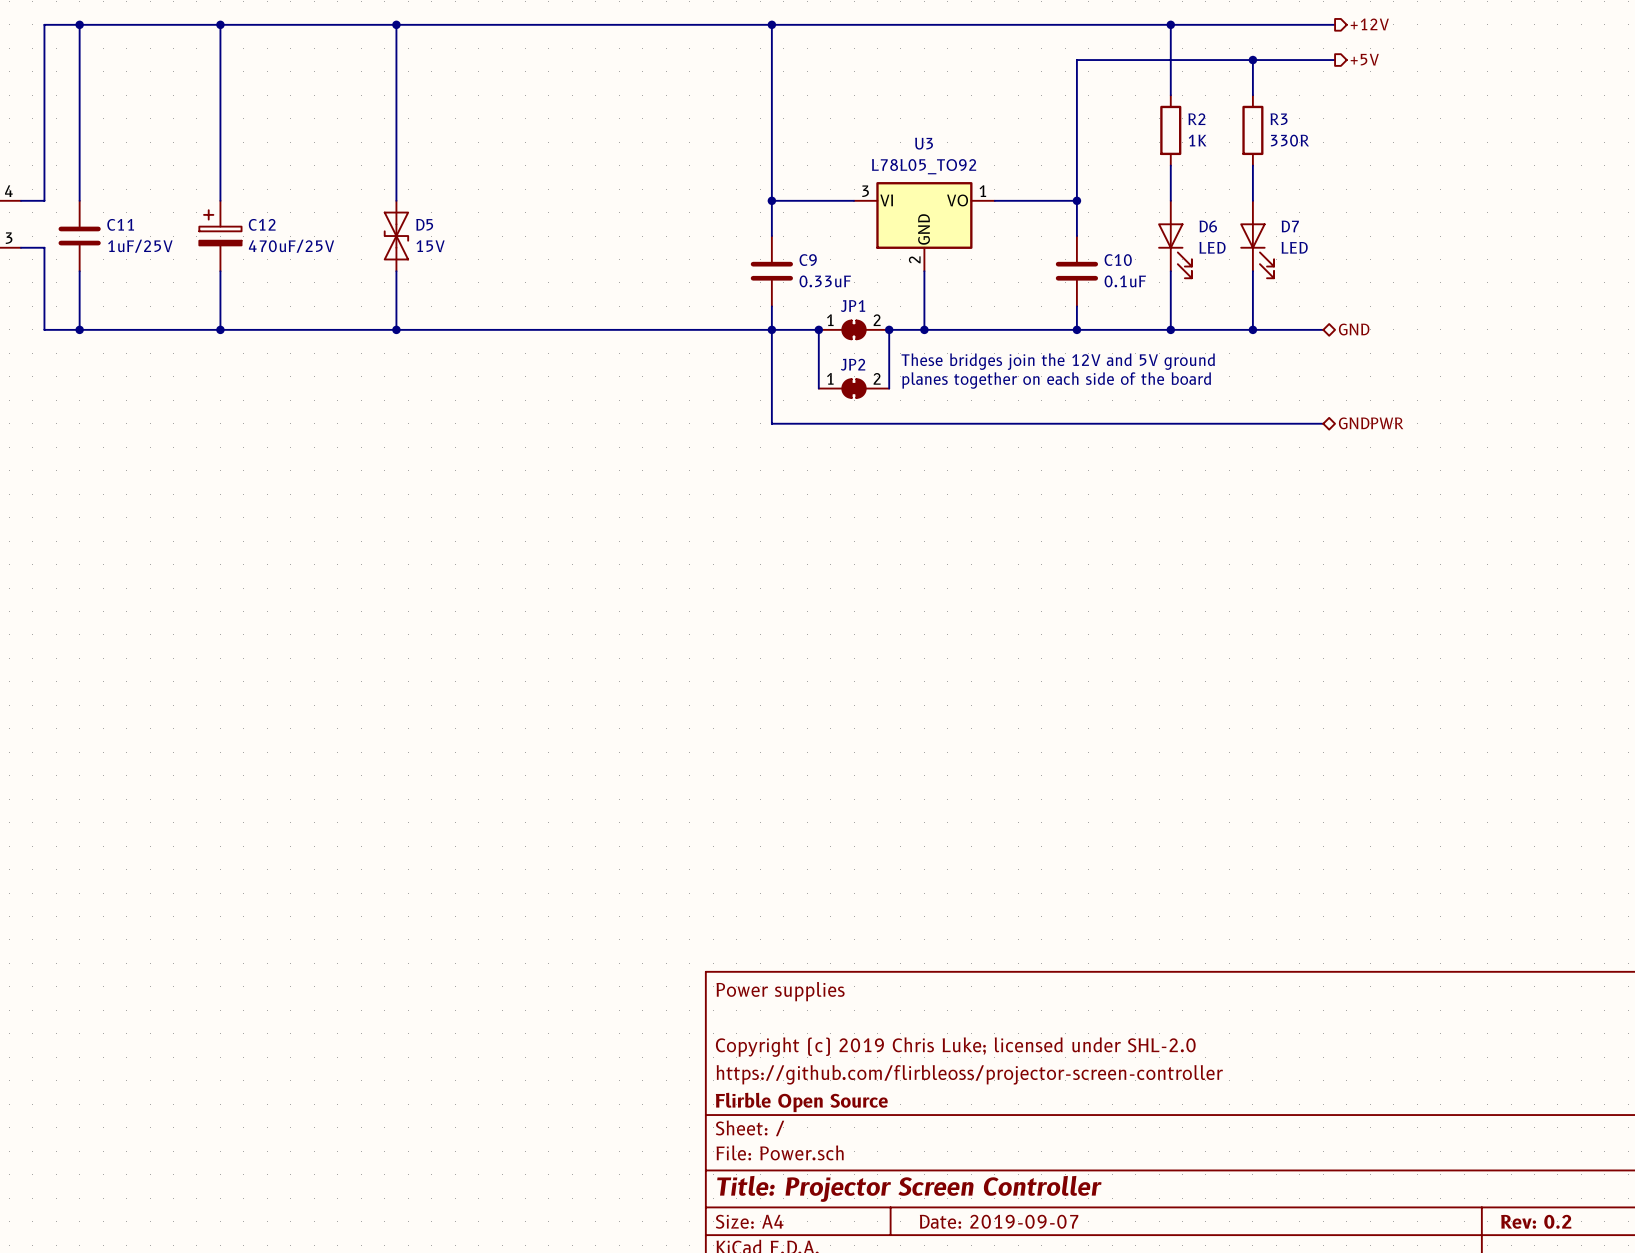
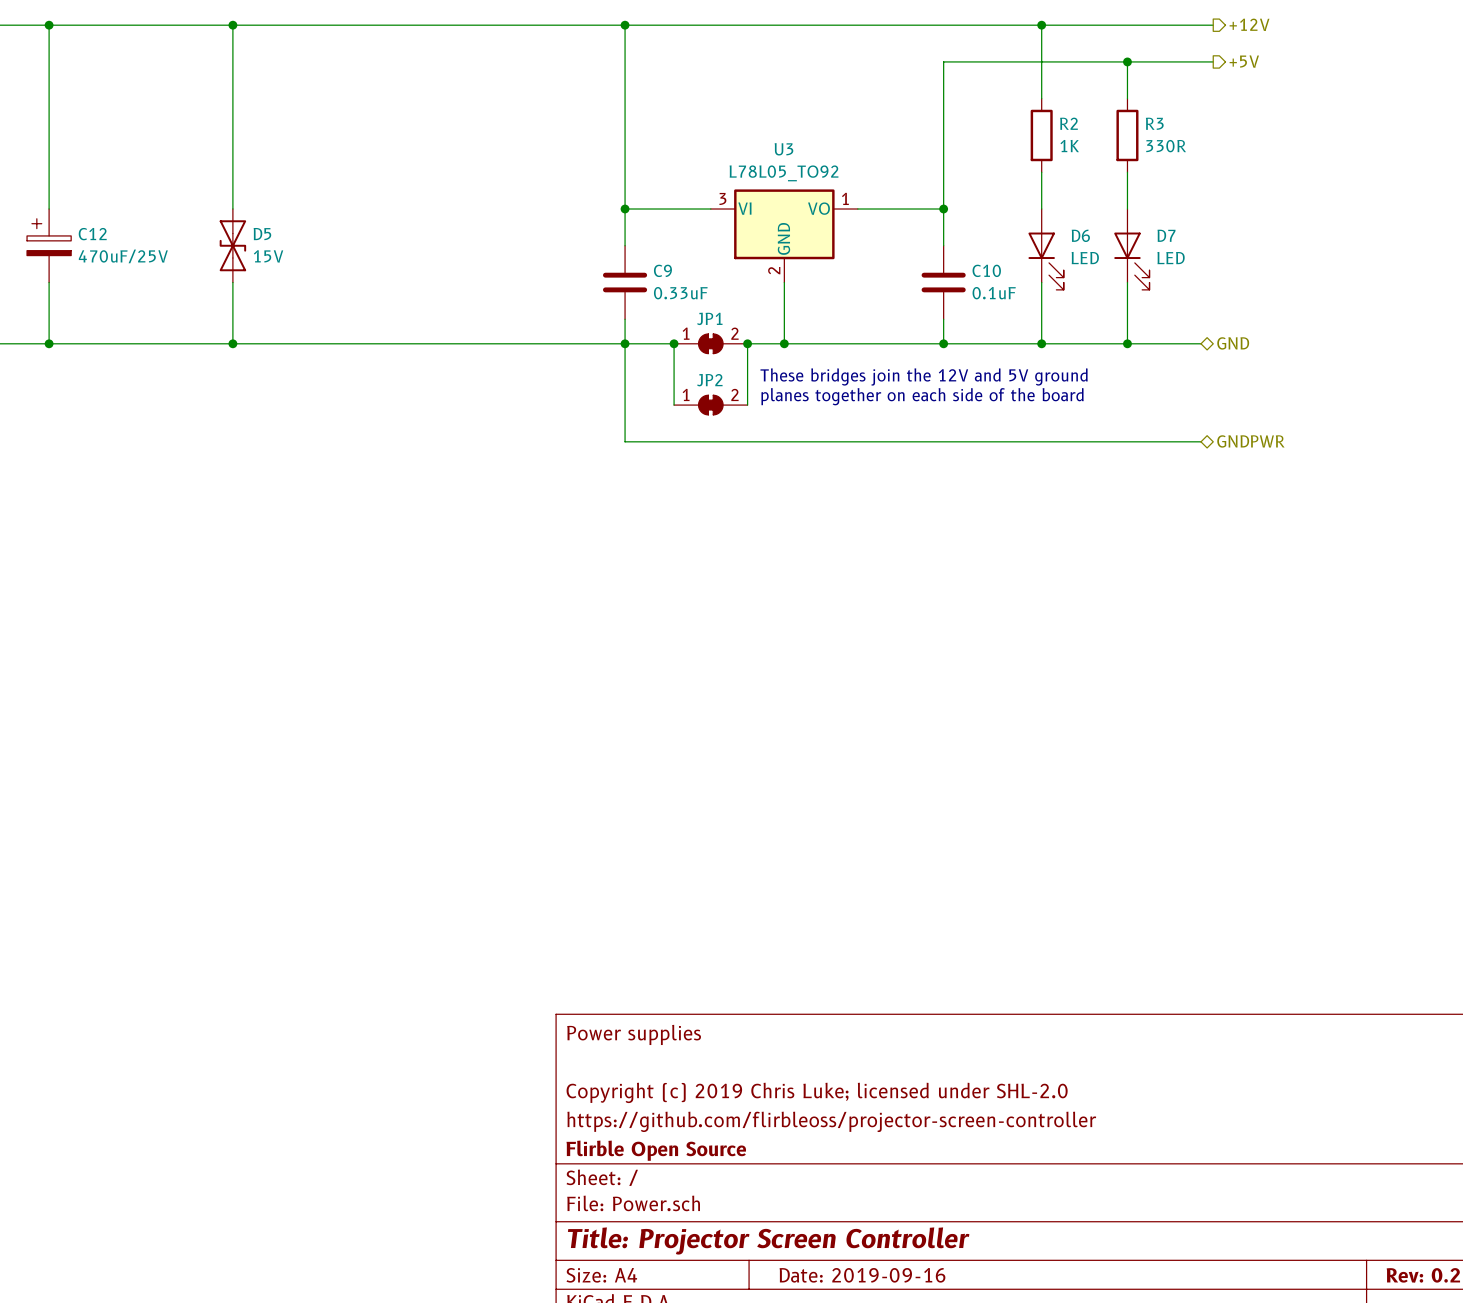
title block: Date: 2019-09-07 (999, 1221) -> Date: 2019-09-16 (862, 1275)

